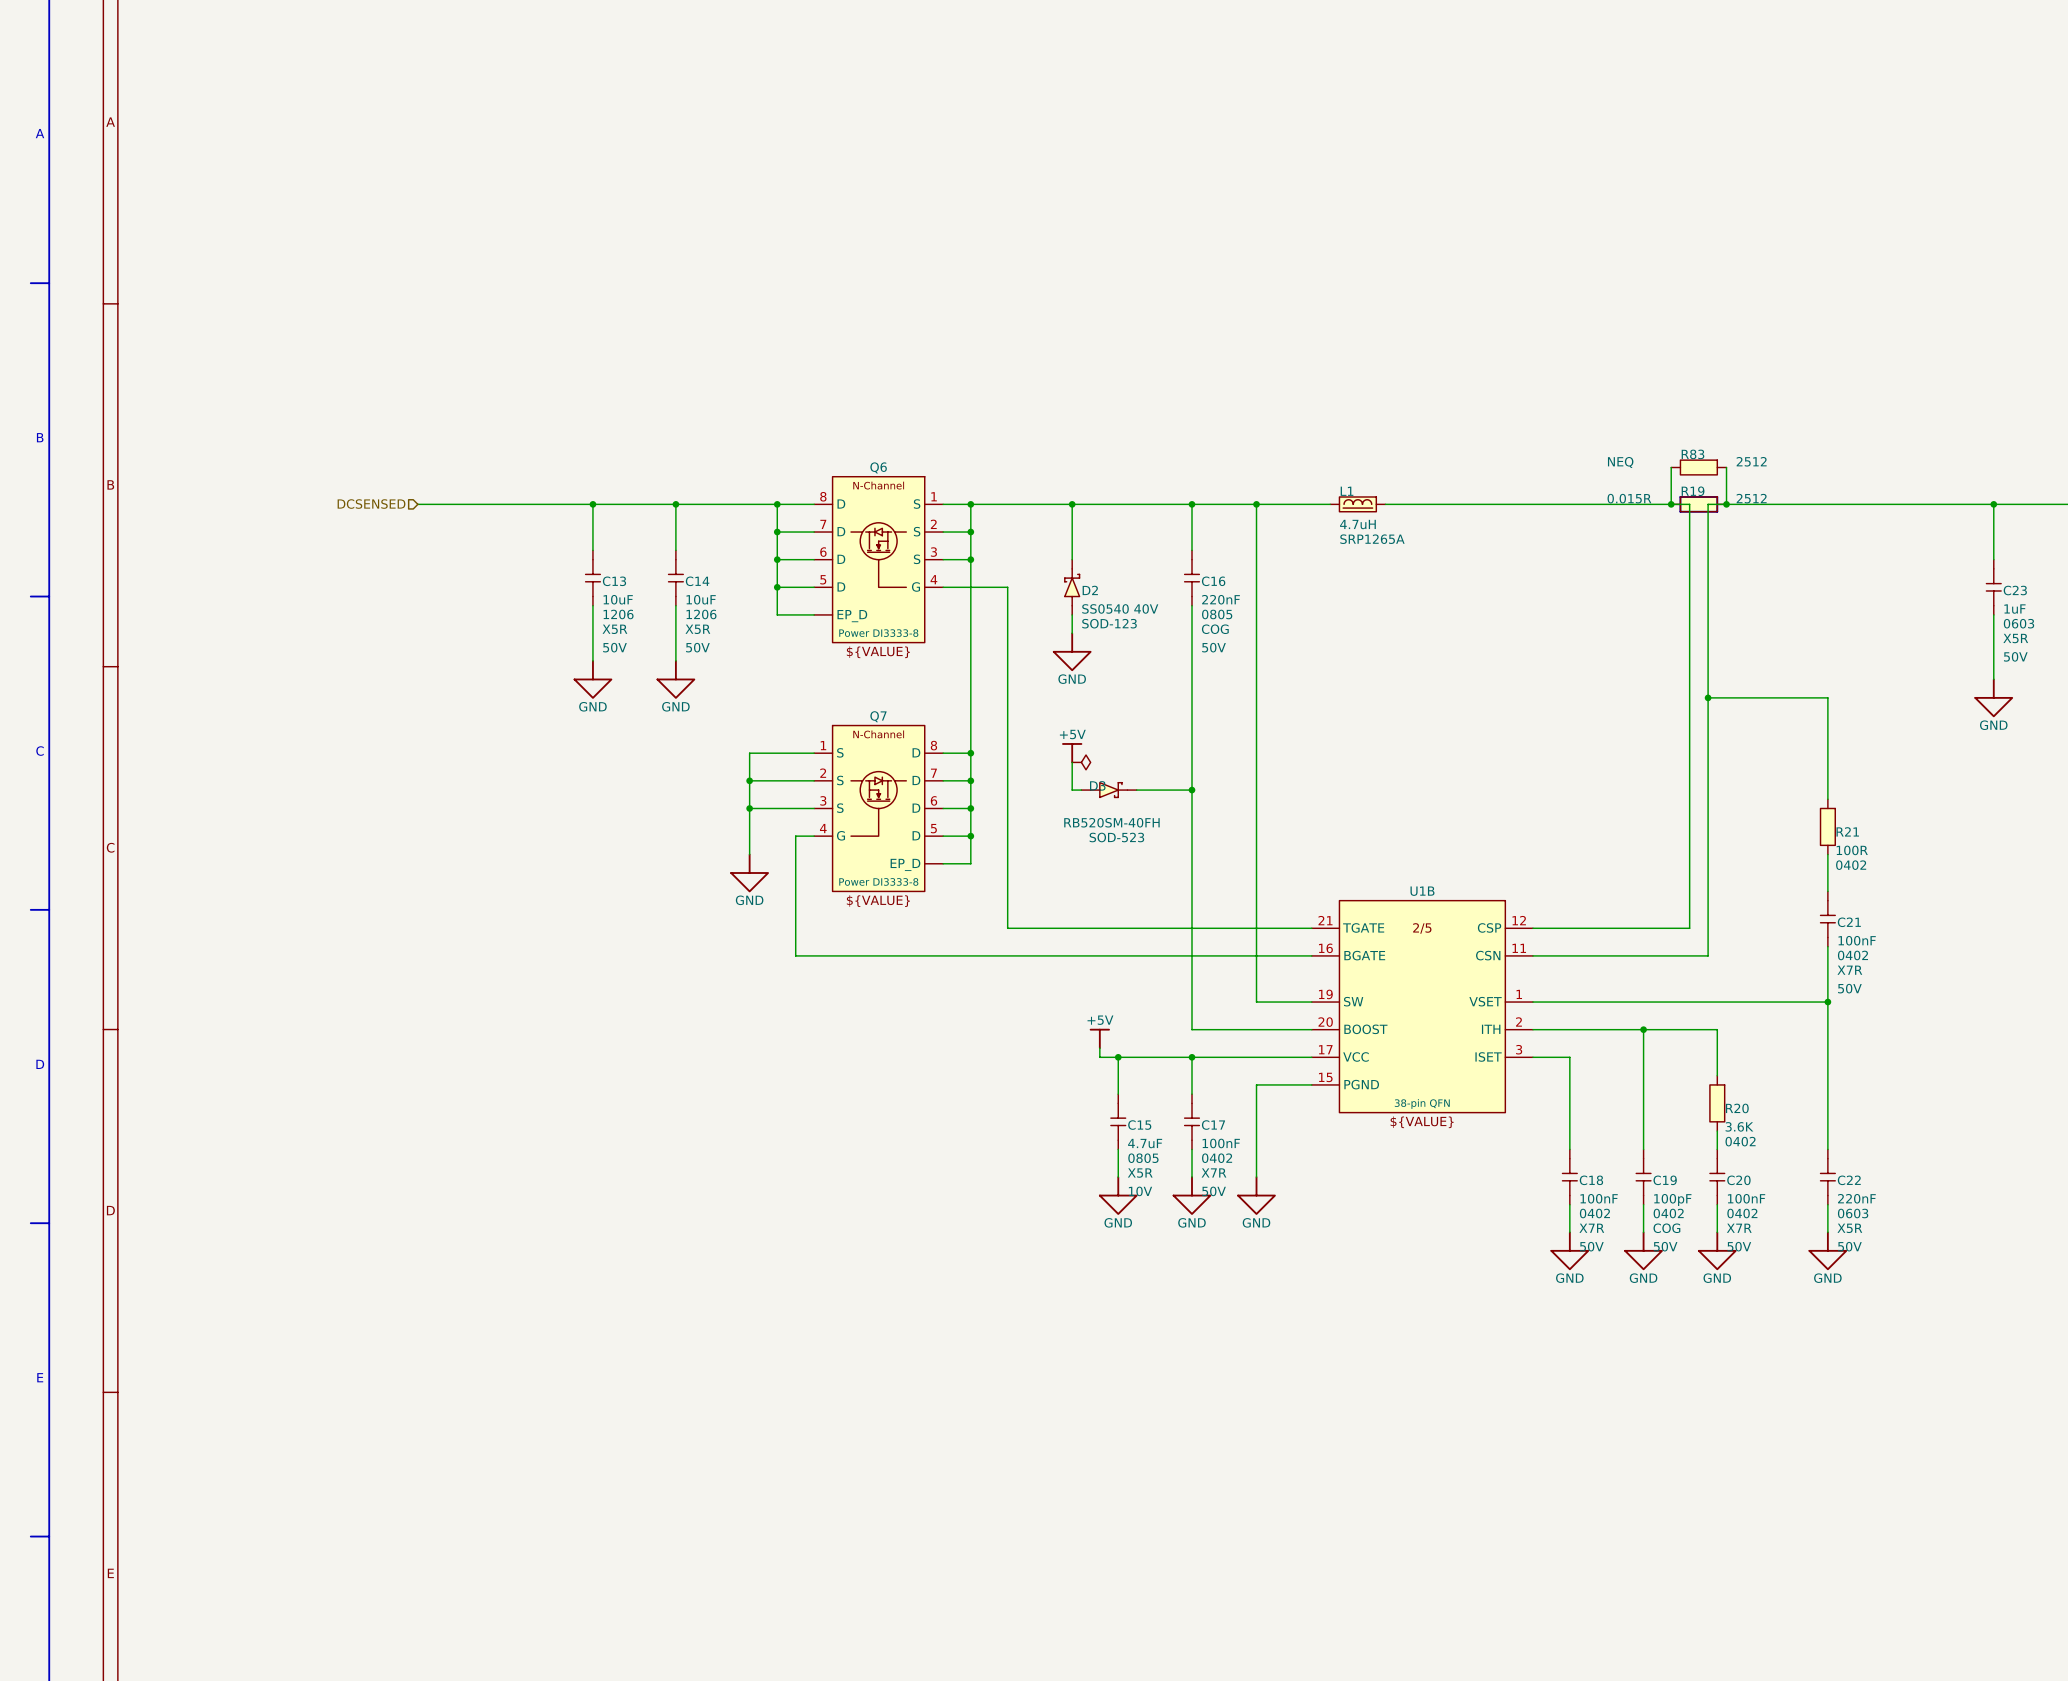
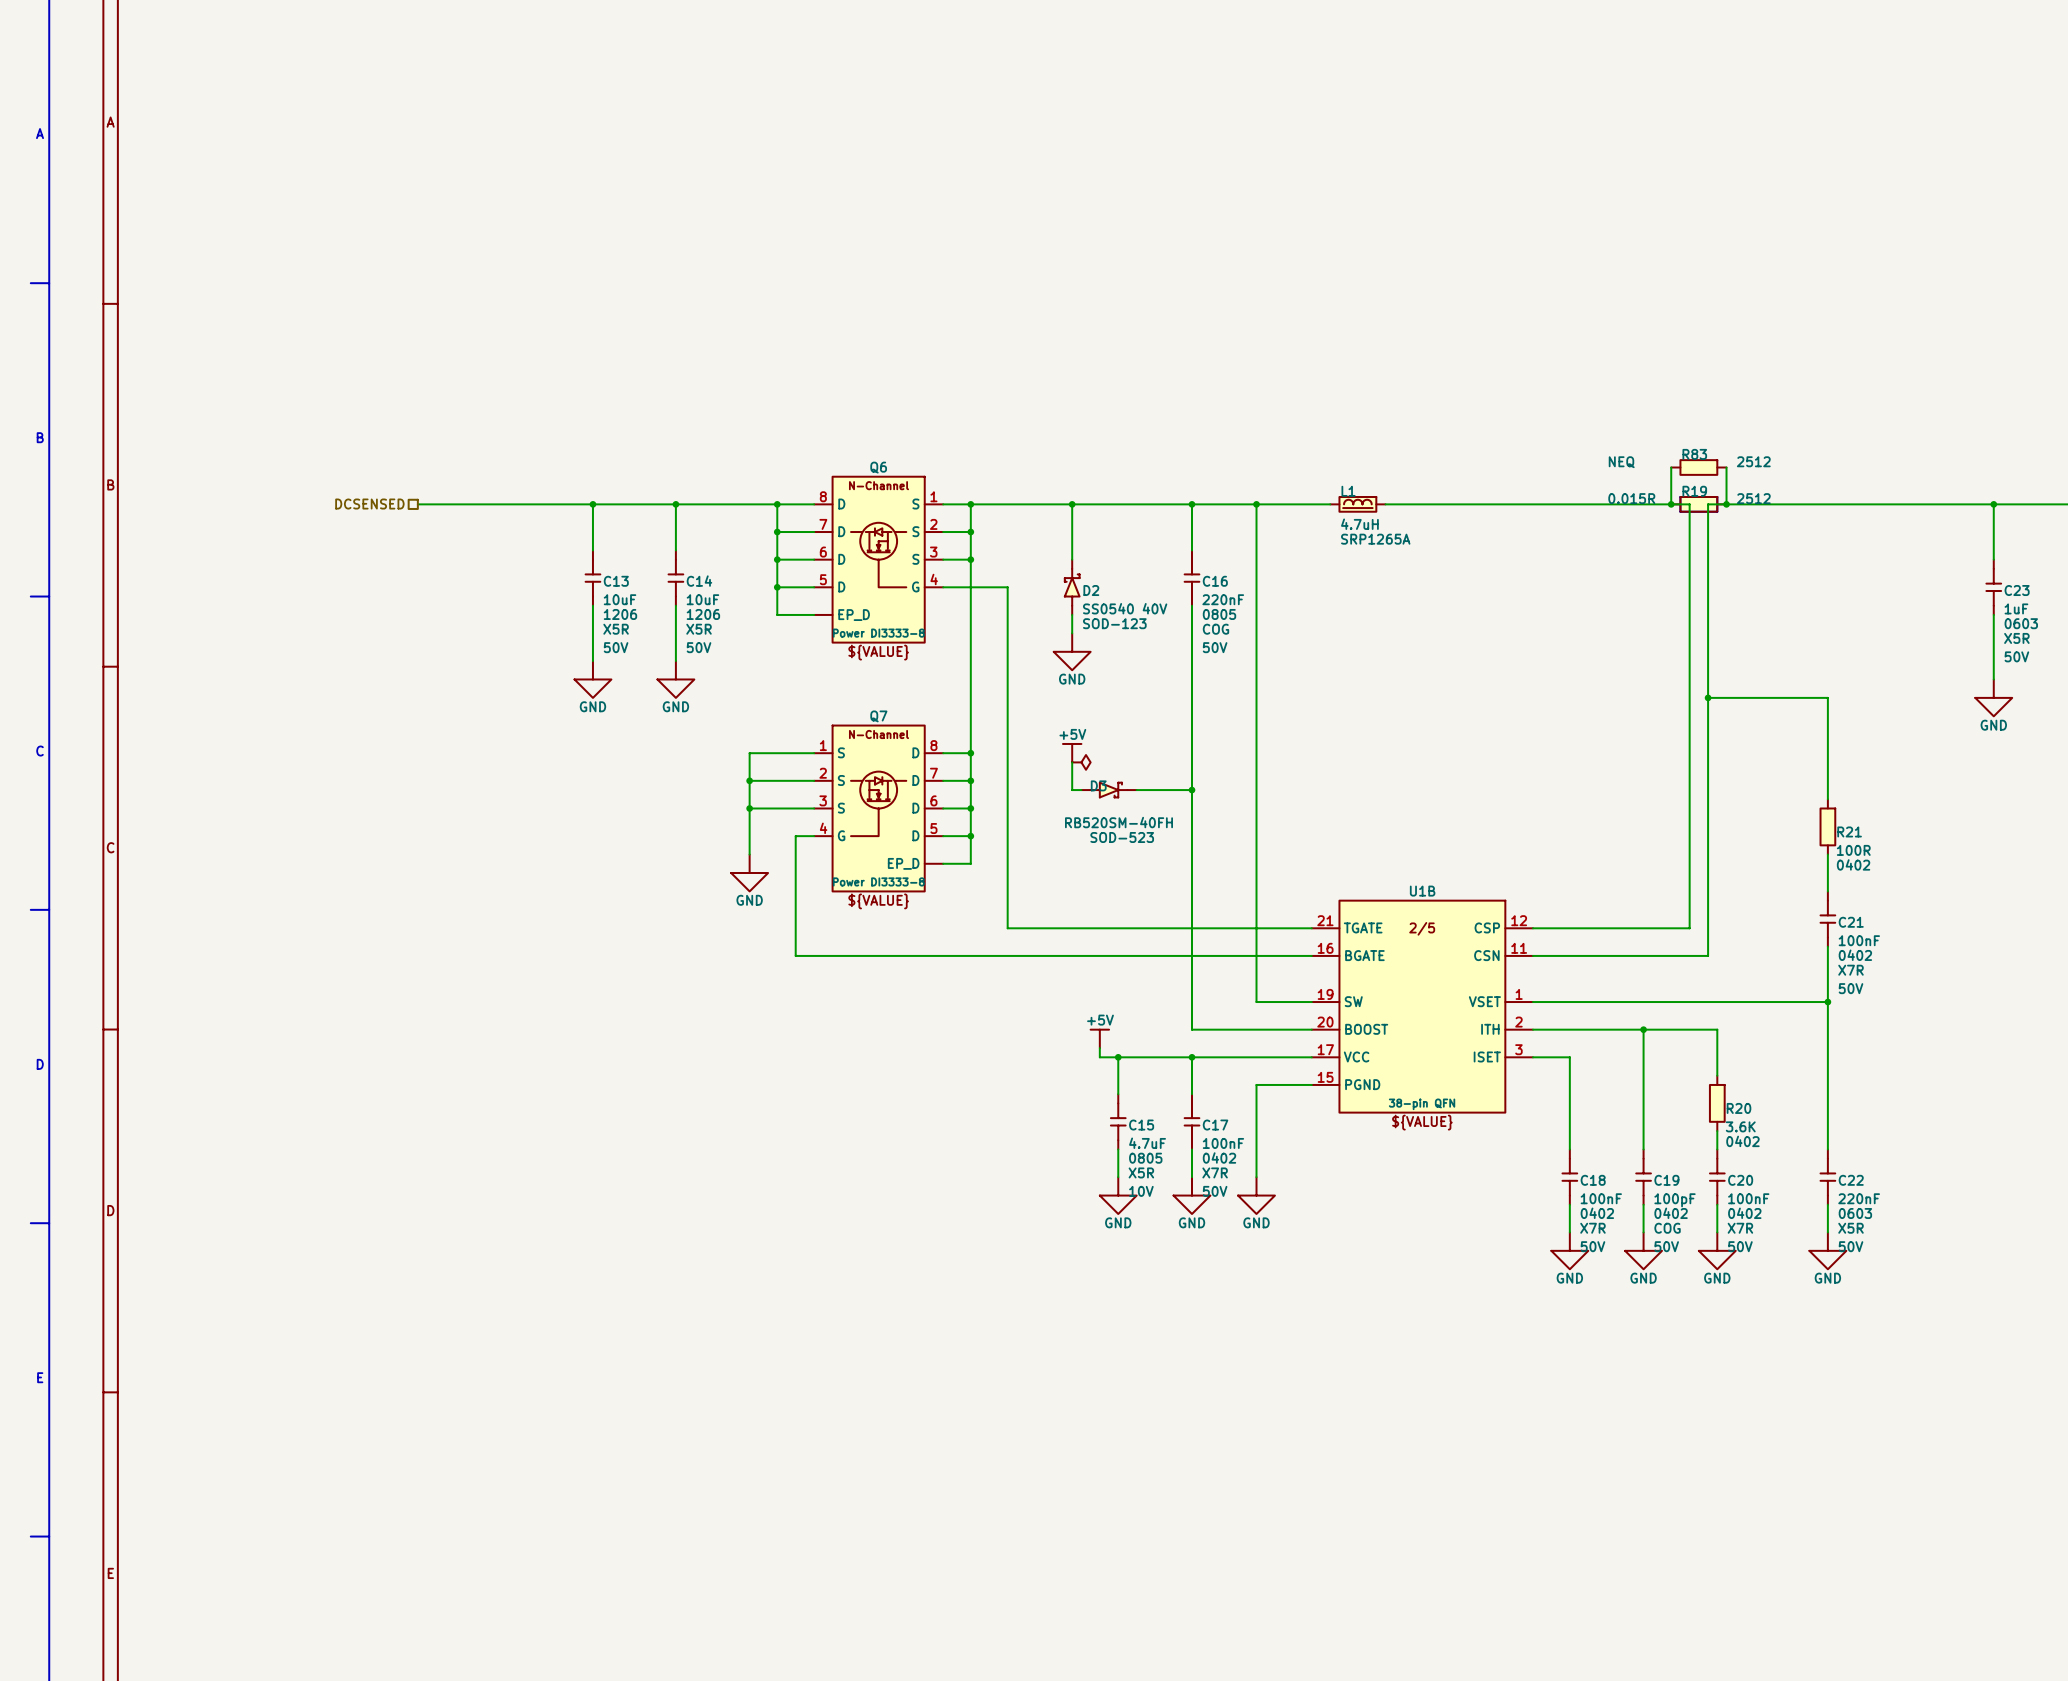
hierarchical label shape: input (371, 504) -> passive (369, 504)

